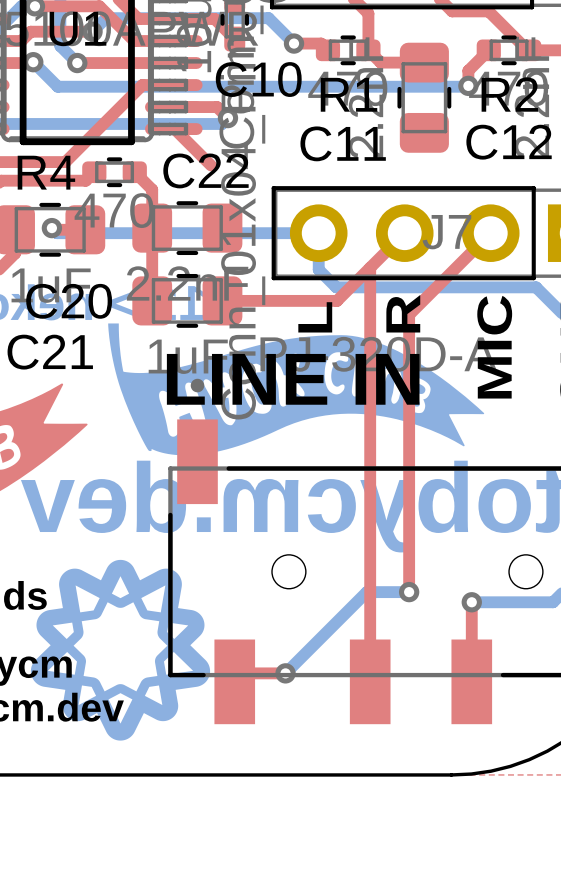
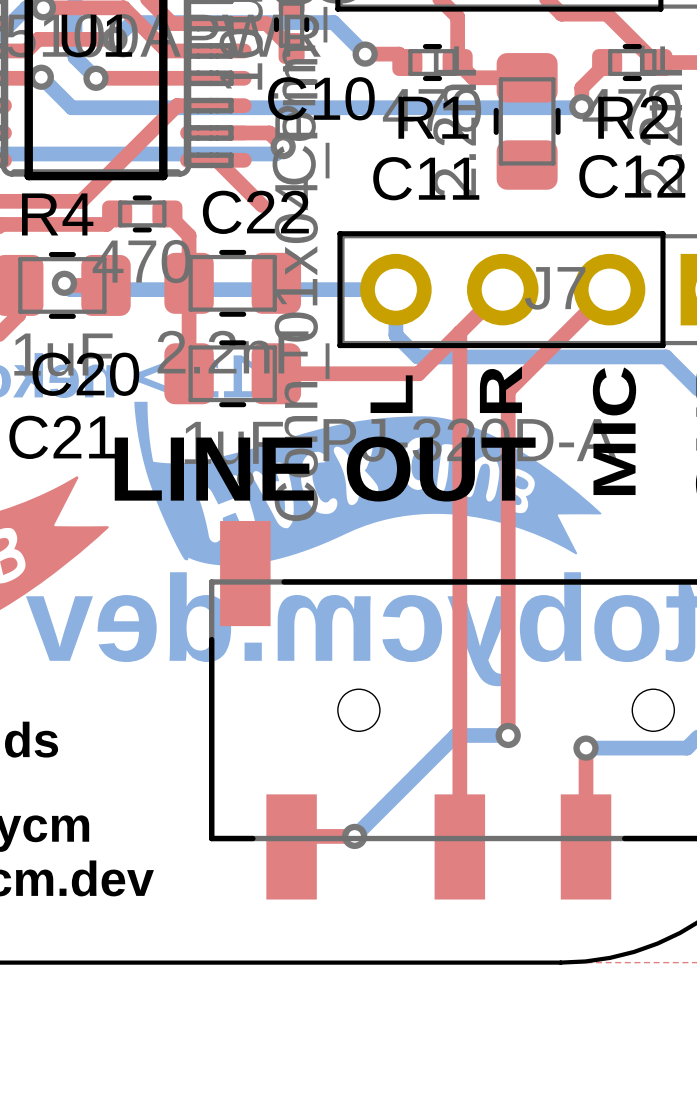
text: LINE IN (293, 379) -> LINE OUT (325, 469)
drawing: [30, 559, 211, 741] -> none

